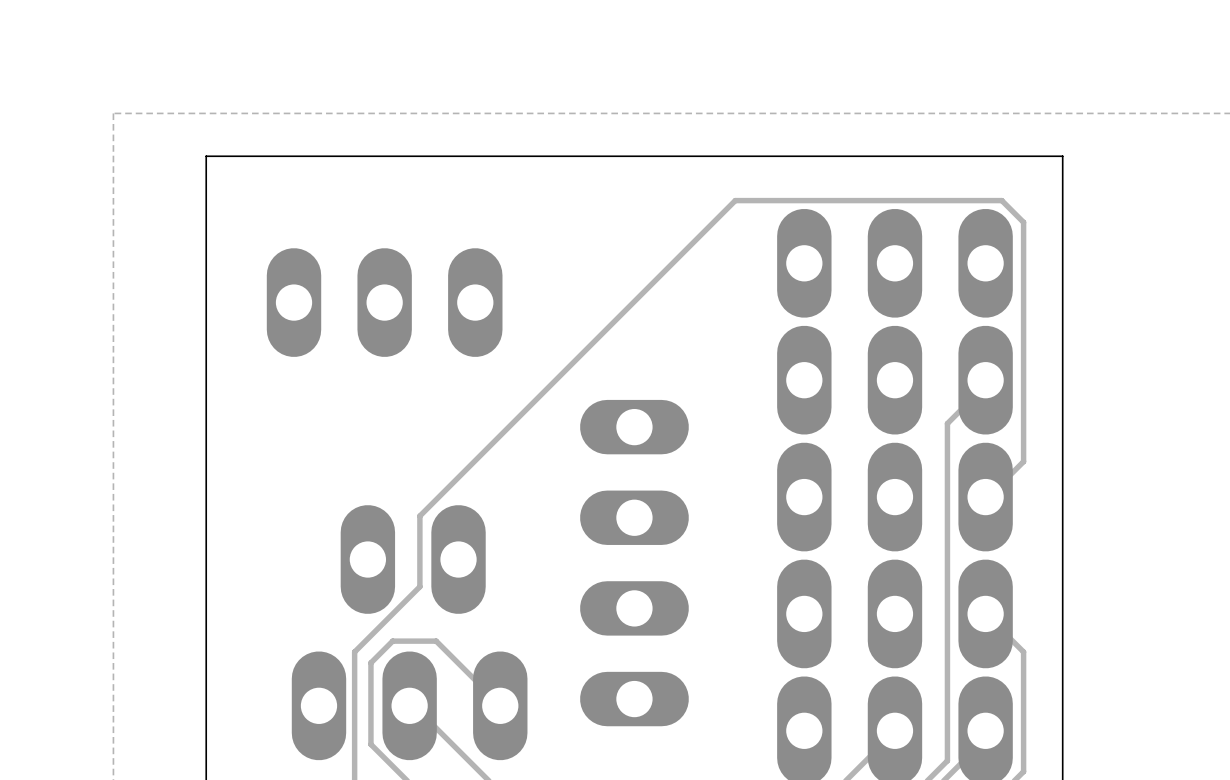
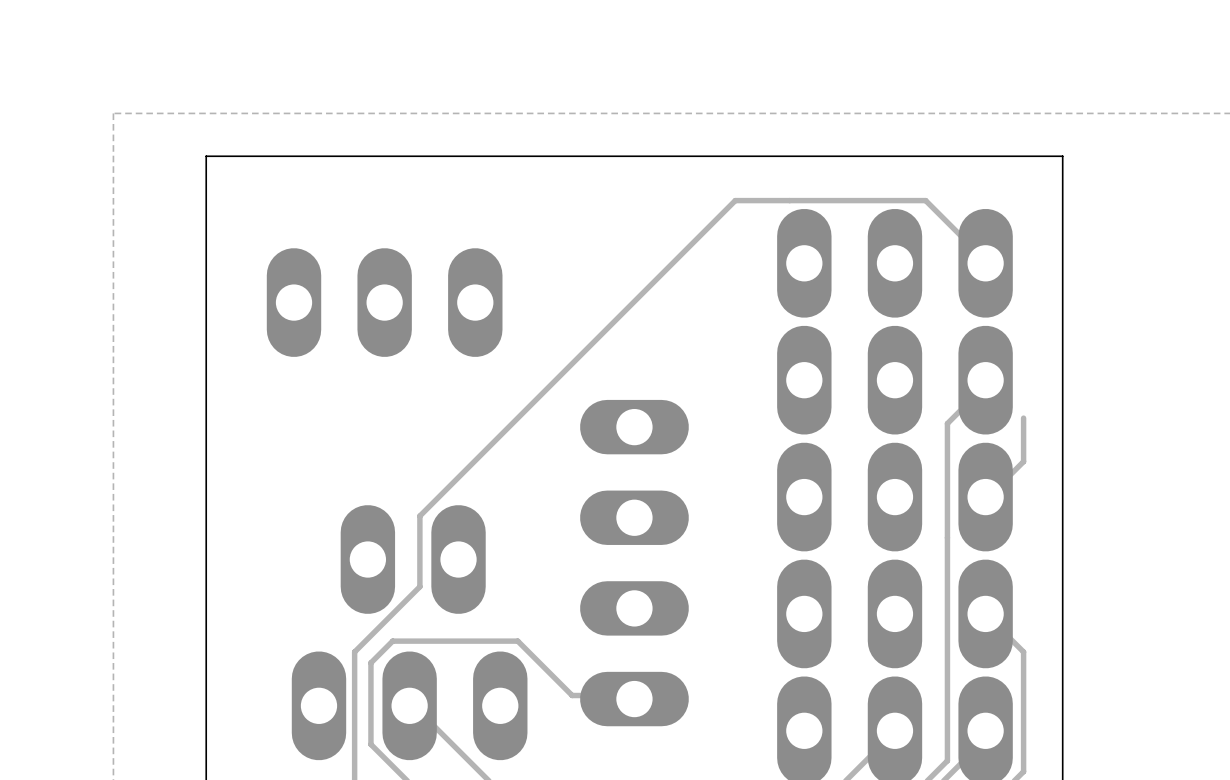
track: (925, 200) (1001, 200) (1023, 222) (1023, 418) -> (925, 200) (985, 260) (985, 263)
track: (436, 641) (500, 705) -> (436, 641) (517, 641) (572, 695) (632, 695) (634, 699)

